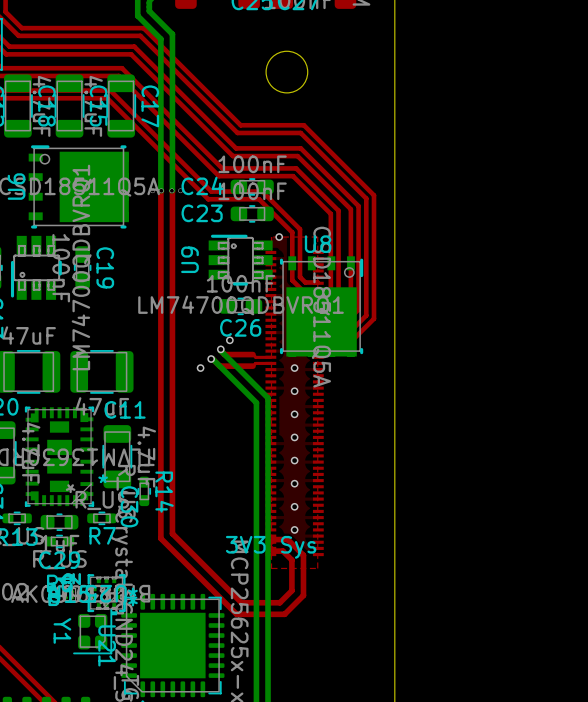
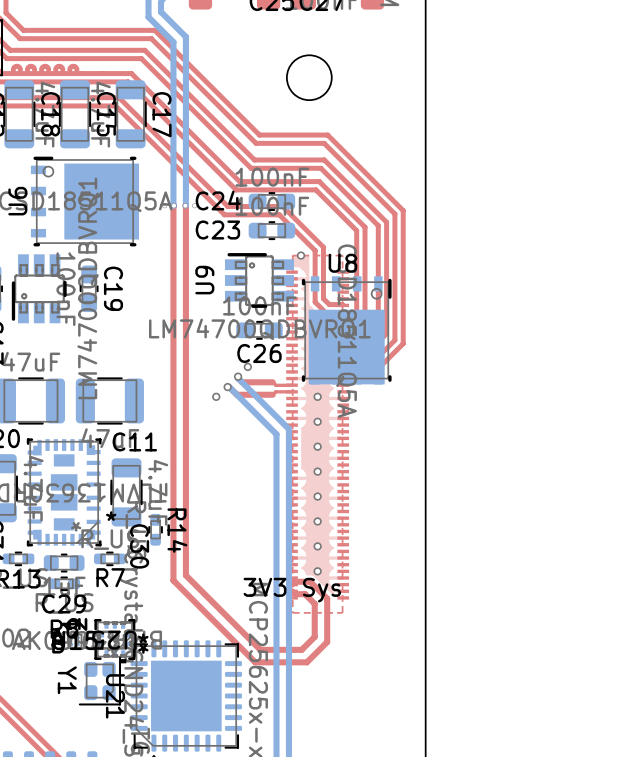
top track: none -> (20, 69) (16, 66) (13, 69)
top track: none -> (34, 69) (30, 66) (27, 69)
top track: none -> (48, 69) (45, 66) (41, 69)
top track: none -> (62, 69) (59, 66) (55, 69)
top track: none -> (76, 69) (73, 66) (69, 69)

